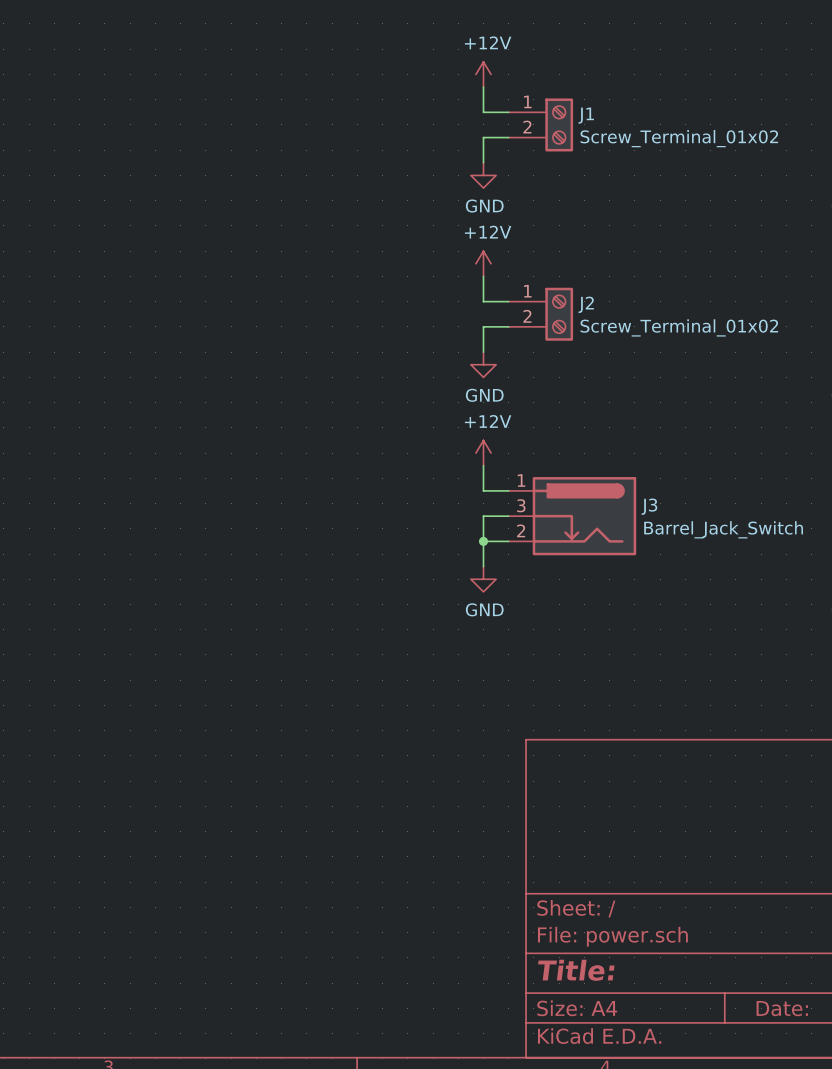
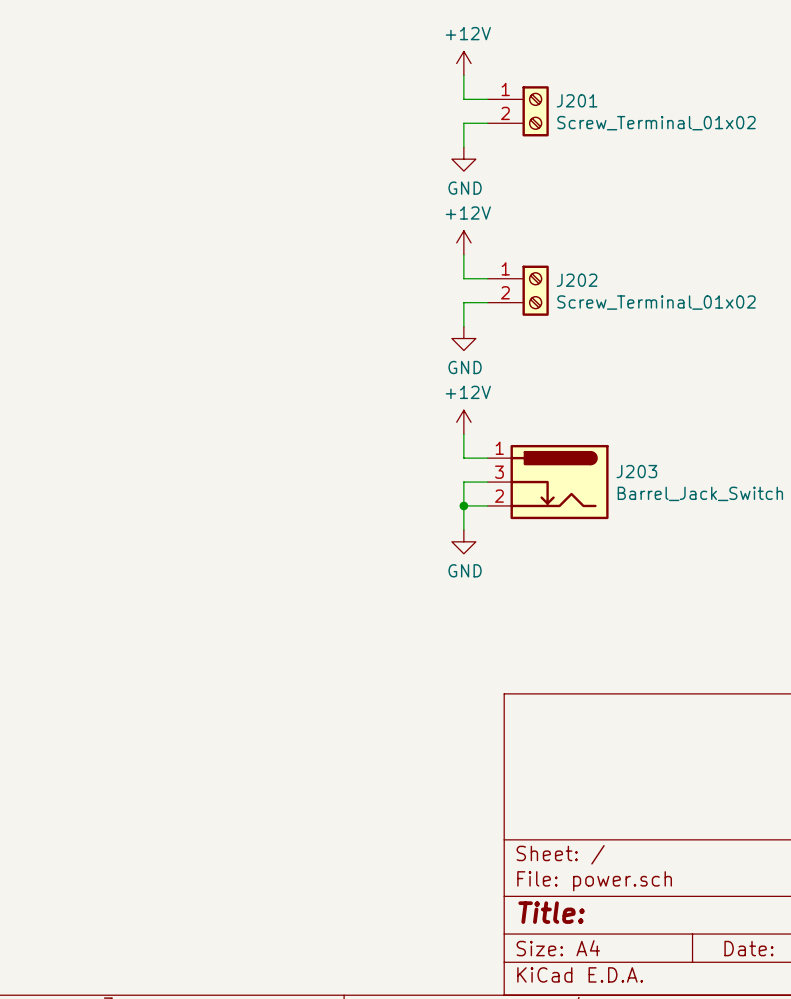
J1 name: J1 (586, 115) -> J201 (577, 100)
J2 name: J2 (586, 304) -> J202 (577, 280)
J3 name: J3 (649, 506) -> J203 (636, 471)

